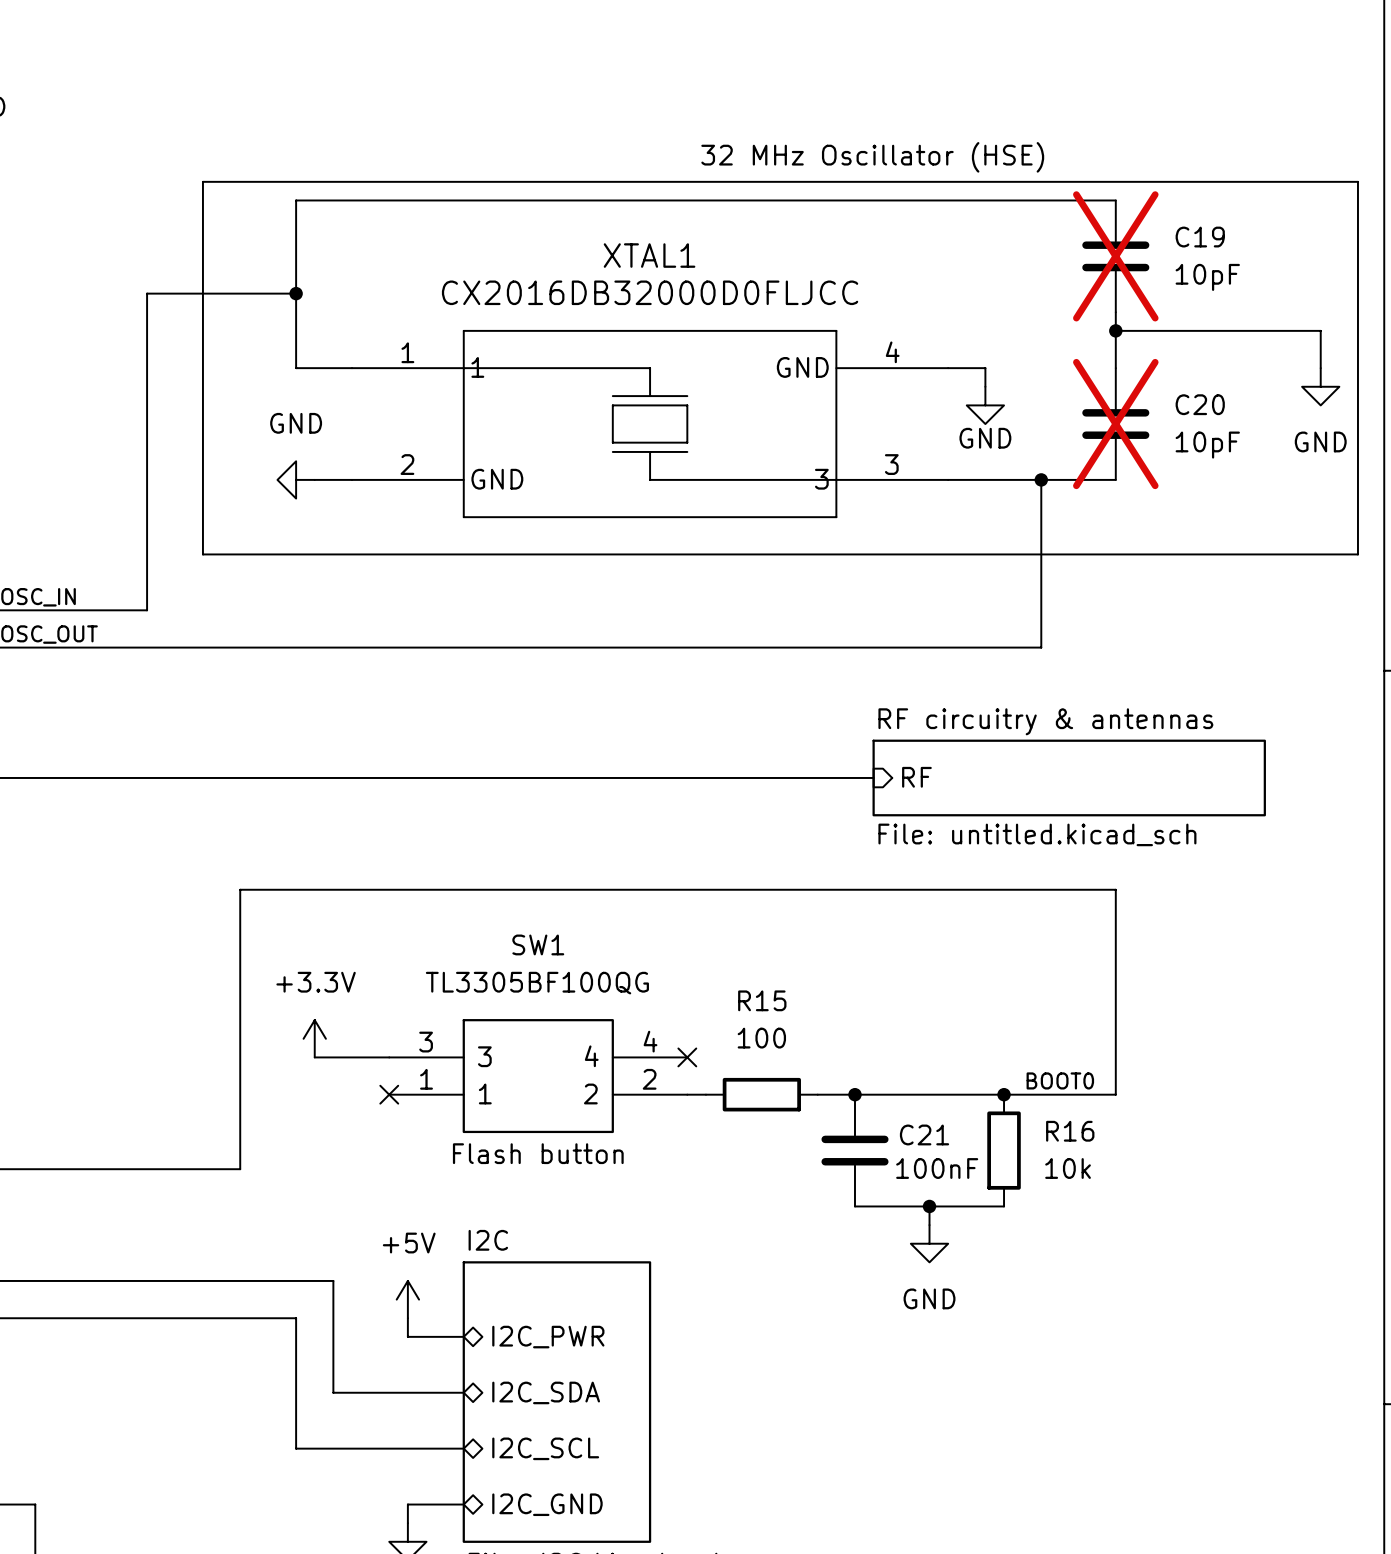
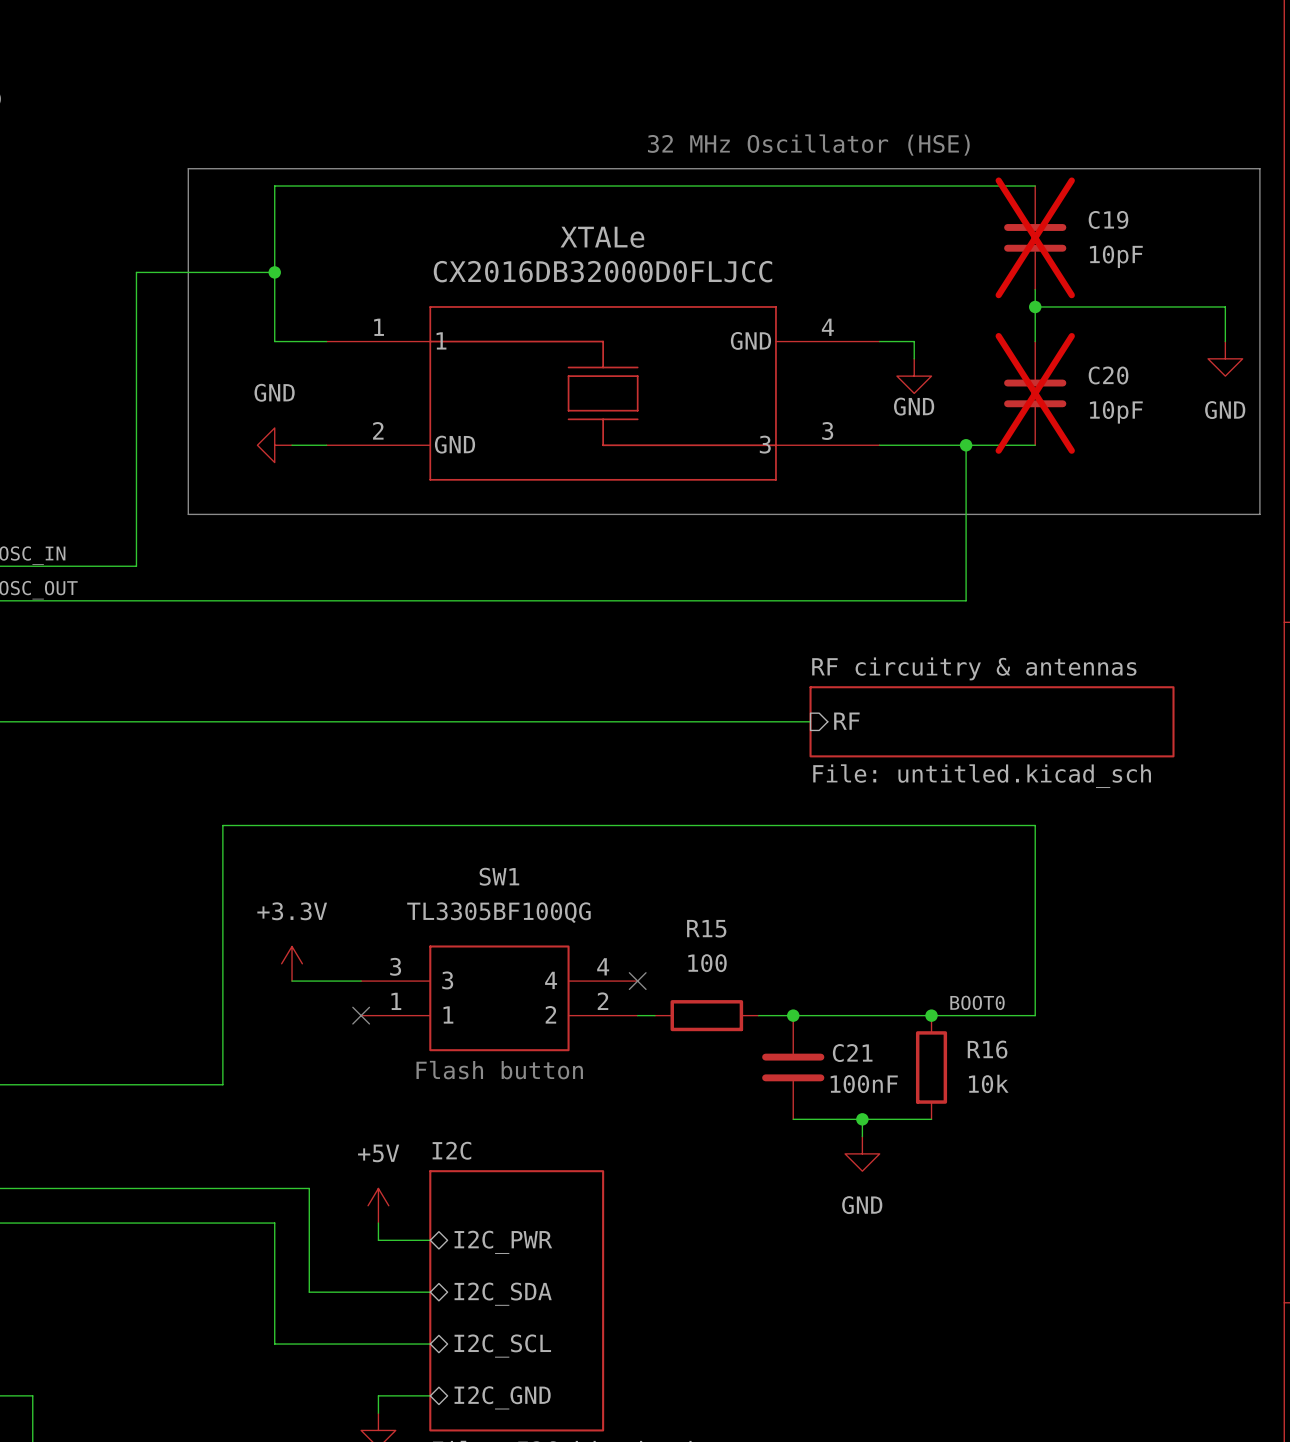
XTAL1 name: XTAL1 (649, 255) -> XTALe (602, 237)

